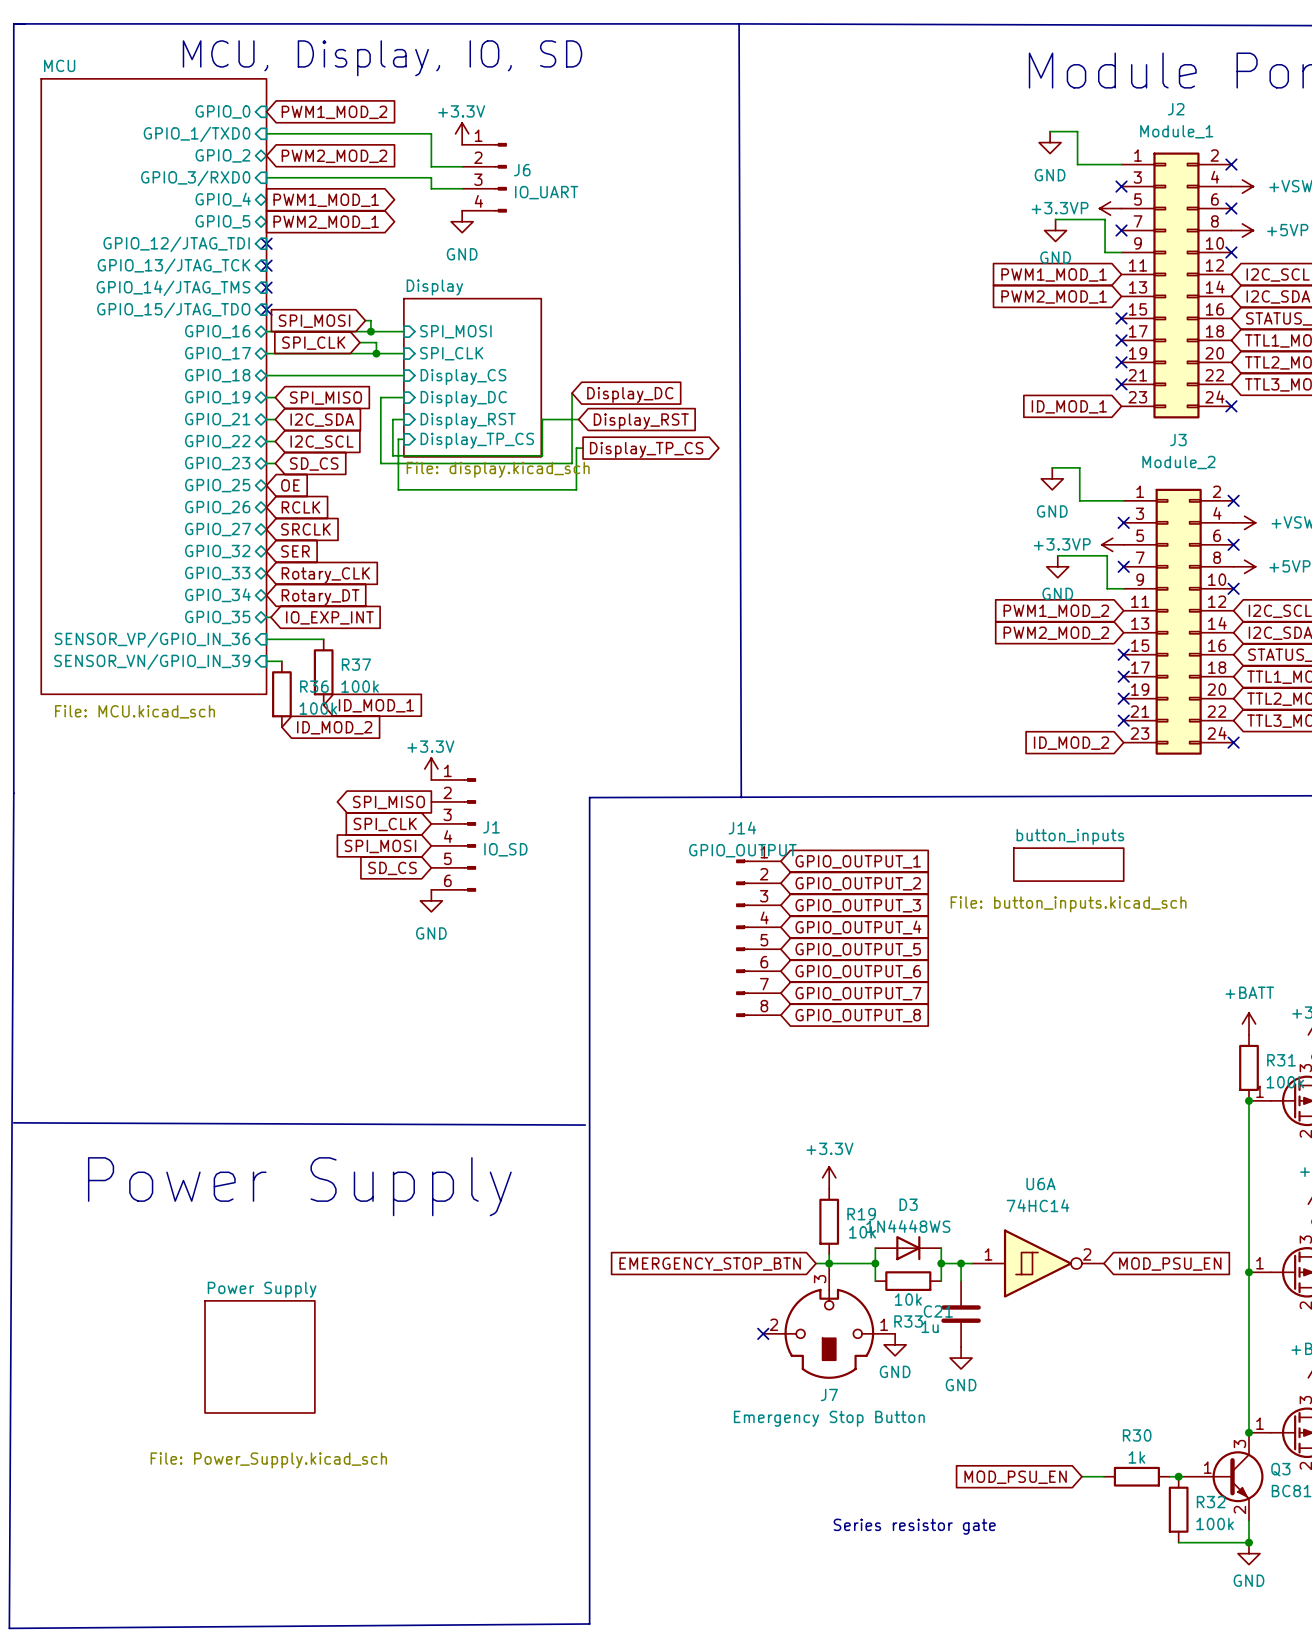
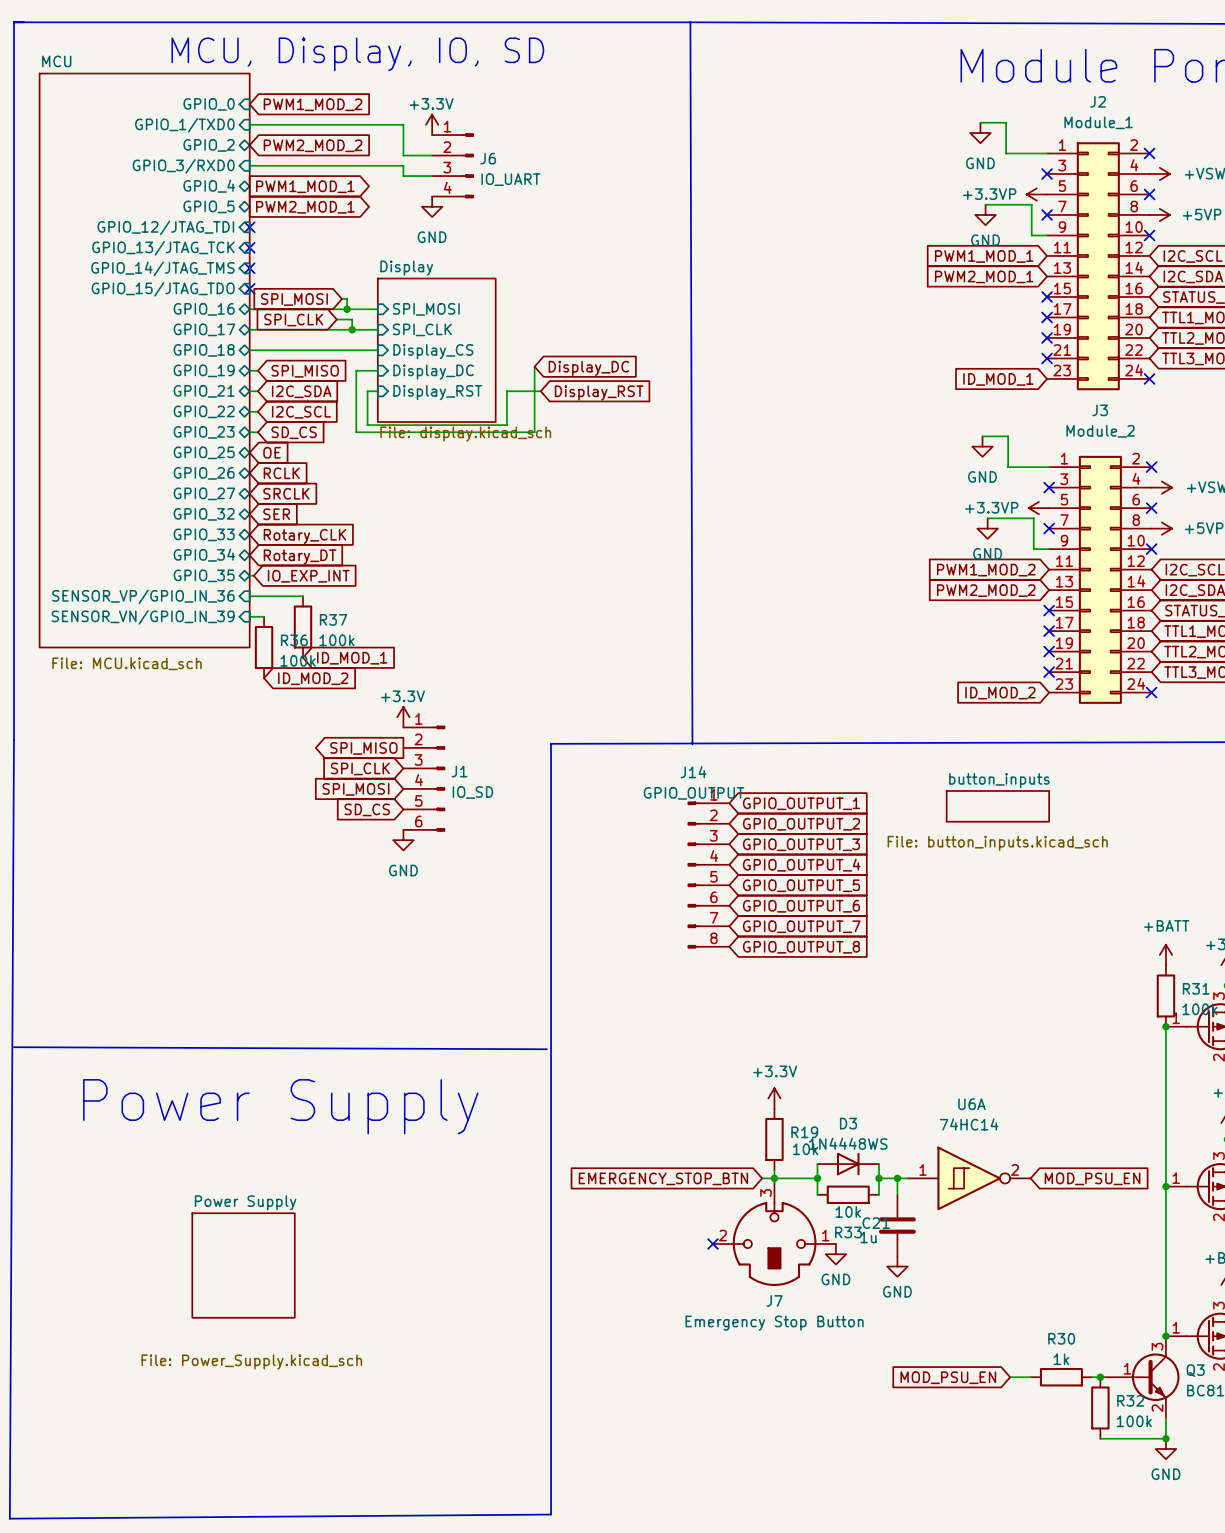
sheet Display shape: [403, 297, 542, 458] -> [377, 277, 497, 423]
wire: (403, 439) (398, 439) (398, 489) (576, 489) (576, 448) (583, 448) -> none
sheet pin: Display_TP_CS (477, 440) -> none
global label: Display_TP_CS (646, 449) -> none
text: Series resistor gate (914, 1526) -> none

